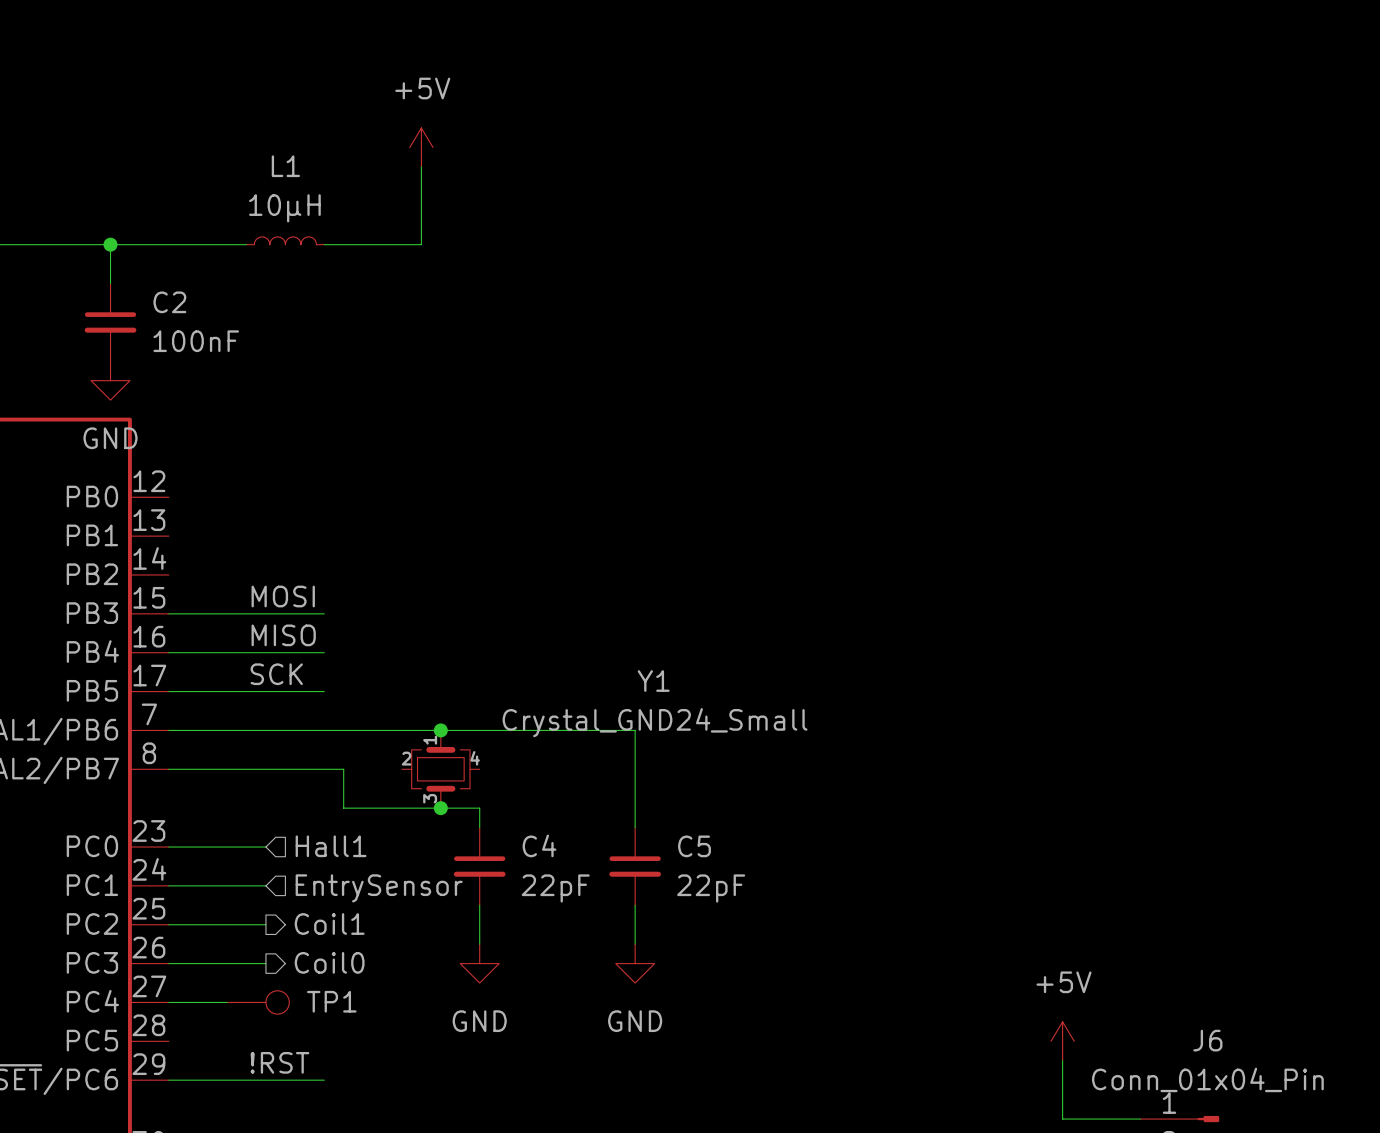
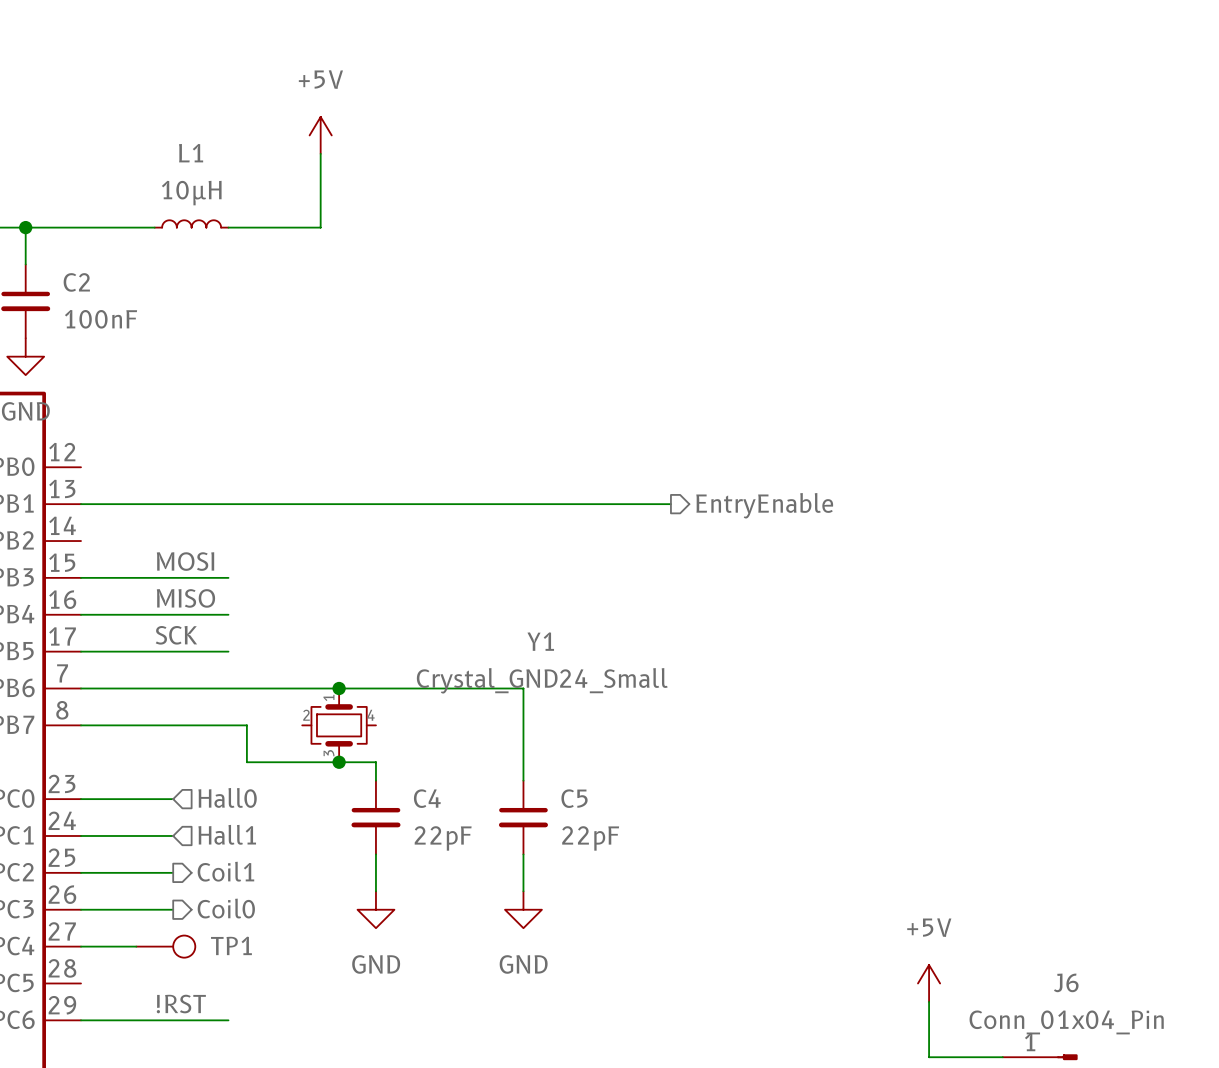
wire: none -> (81, 504) (670, 504)
hierarchical label: none -> EntryEnable (764, 505)
hierarchical label: Hall1 (331, 846) -> Hall0 (227, 797)
hierarchical label: EntrySensor (379, 888) -> Hall1 (227, 834)

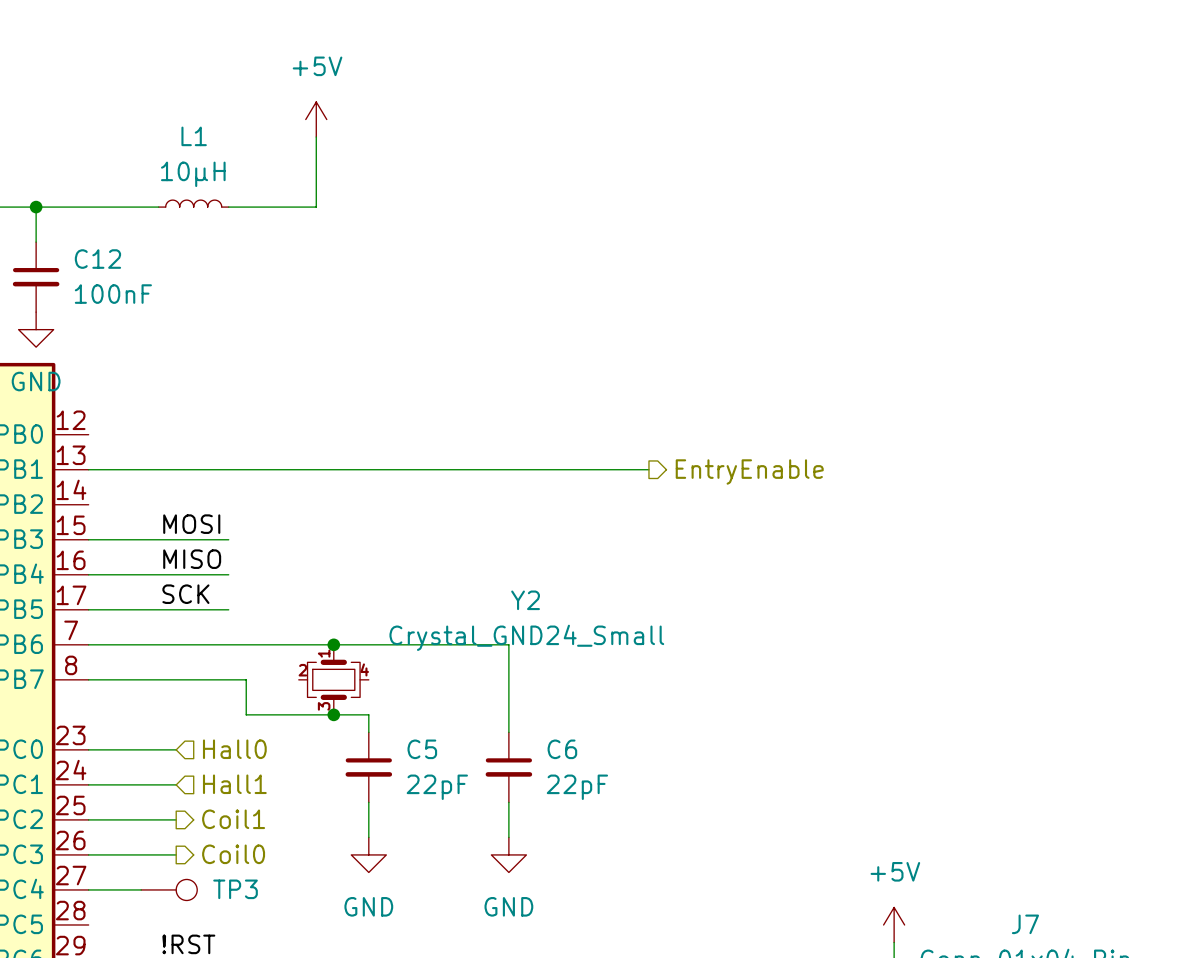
C2 name: C2 (76, 282) -> C12 (97, 259)
Y1 name: Y1 (540, 641) -> Y2 (525, 600)
C4 name: C4 (427, 798) -> C5 (422, 749)
C5 name: C5 (574, 798) -> C6 (562, 749)
TP1 name: TP1 (231, 945) -> TP3 (235, 889)
J6 name: J6 (1066, 982) -> J7 (1025, 924)

